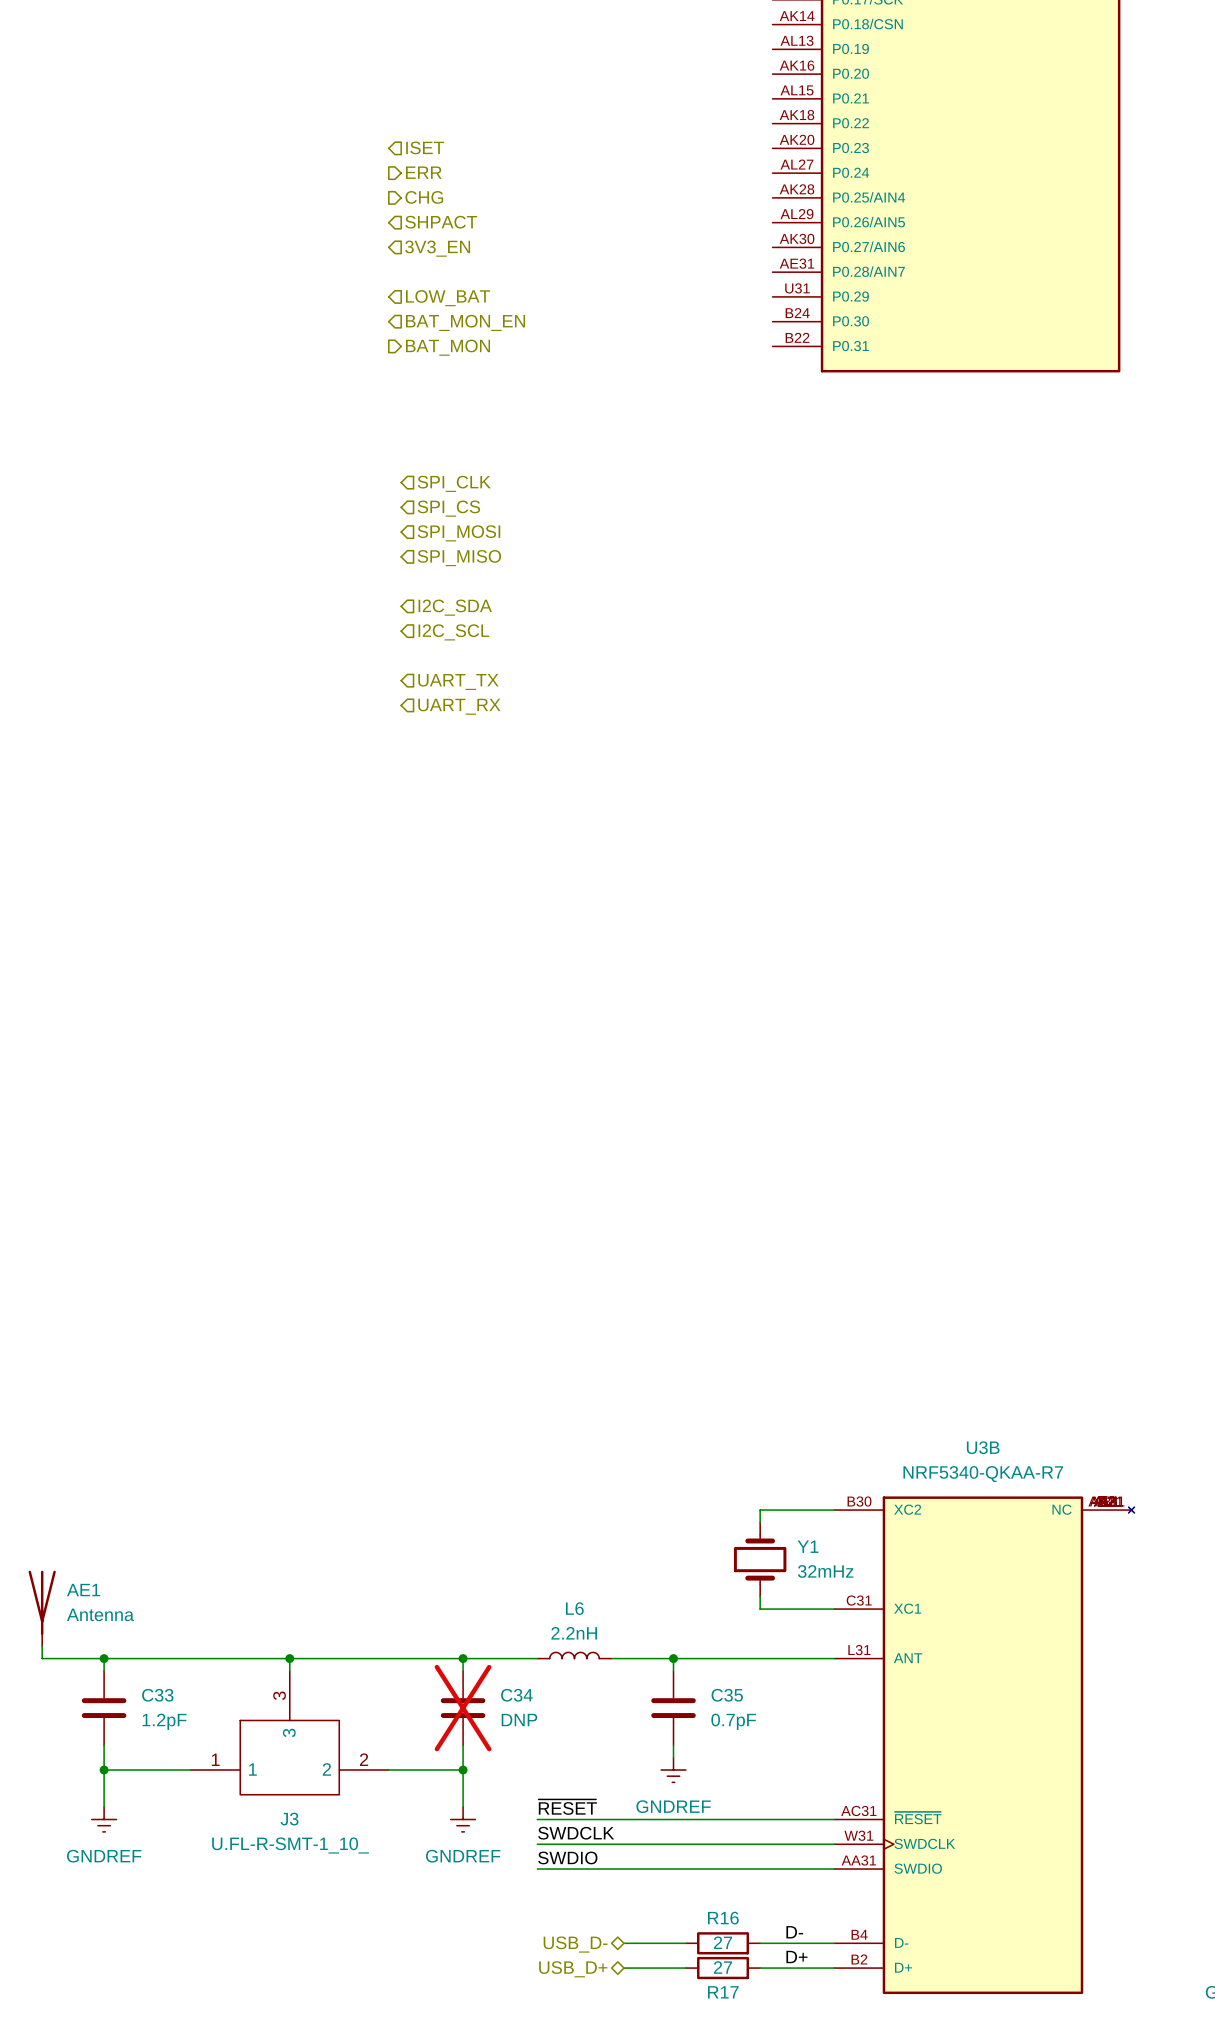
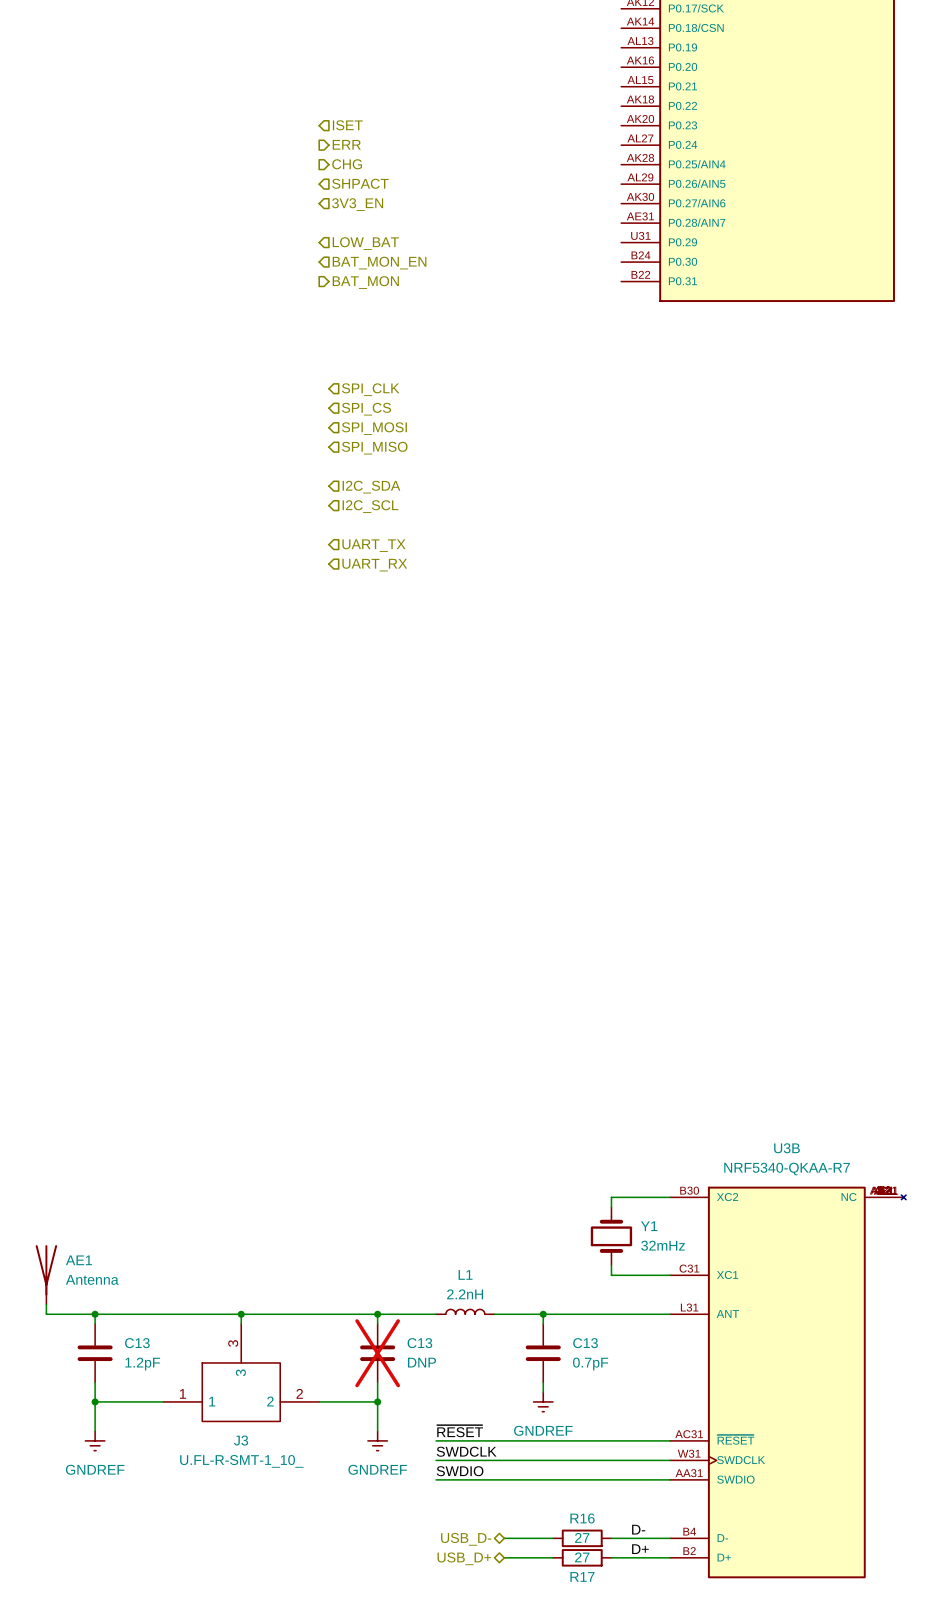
L6 name: L6 (574, 1608) -> L1 (465, 1274)
C33 name: C33 (157, 1695) -> C13 (137, 1343)
C34 name: C34 (516, 1695) -> C13 (419, 1343)
C35 name: C35 (727, 1695) -> C13 (585, 1343)

